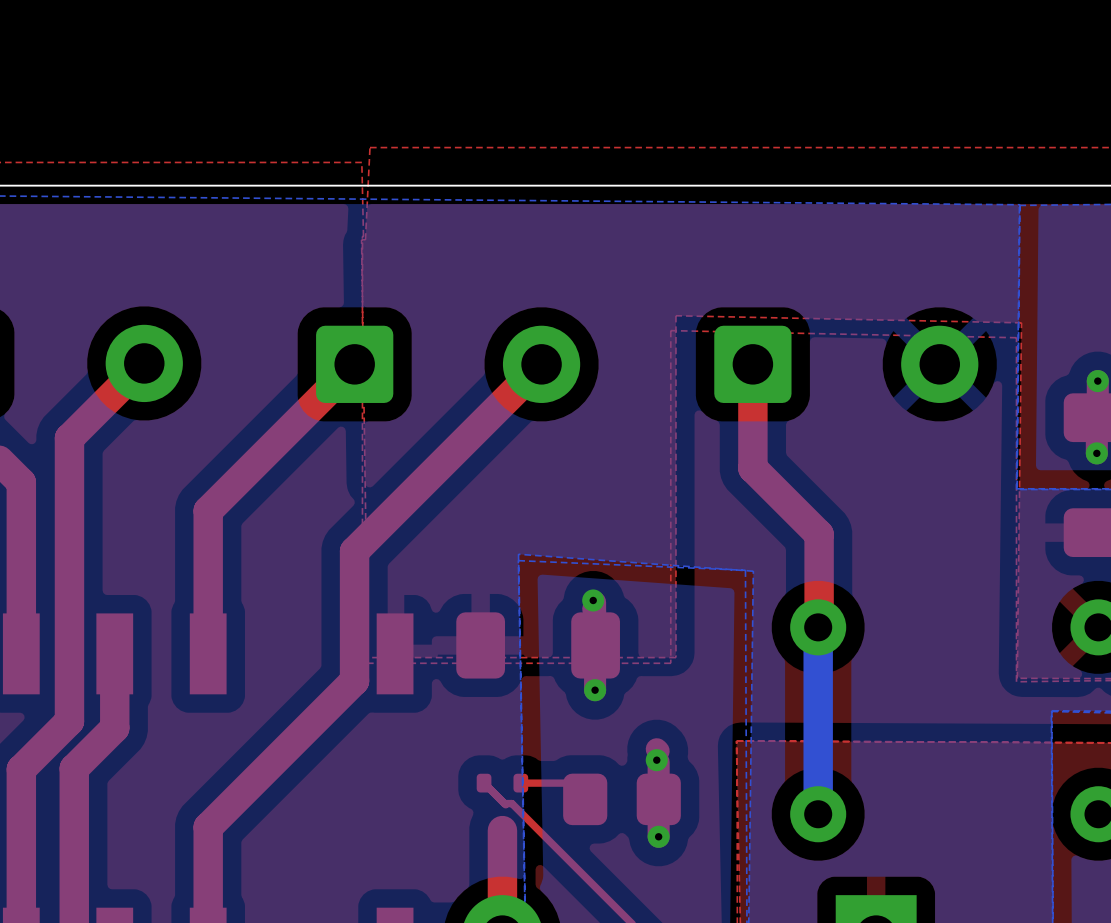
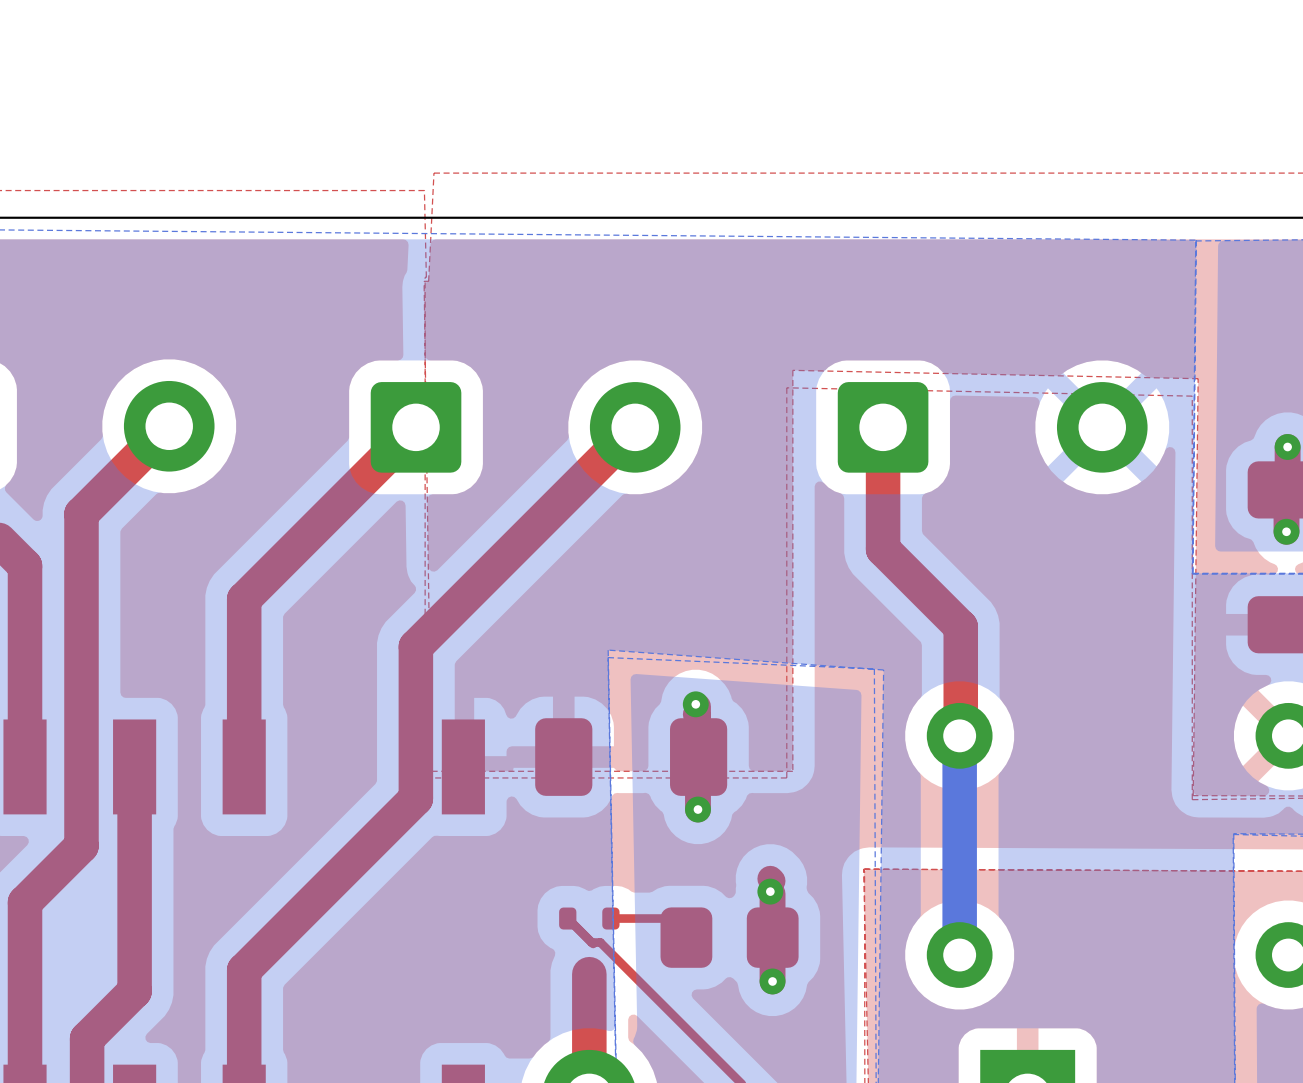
top track: (114, 728) (74, 768) (74, 885) -> (134, 853) (134, 991) (87, 1038)

